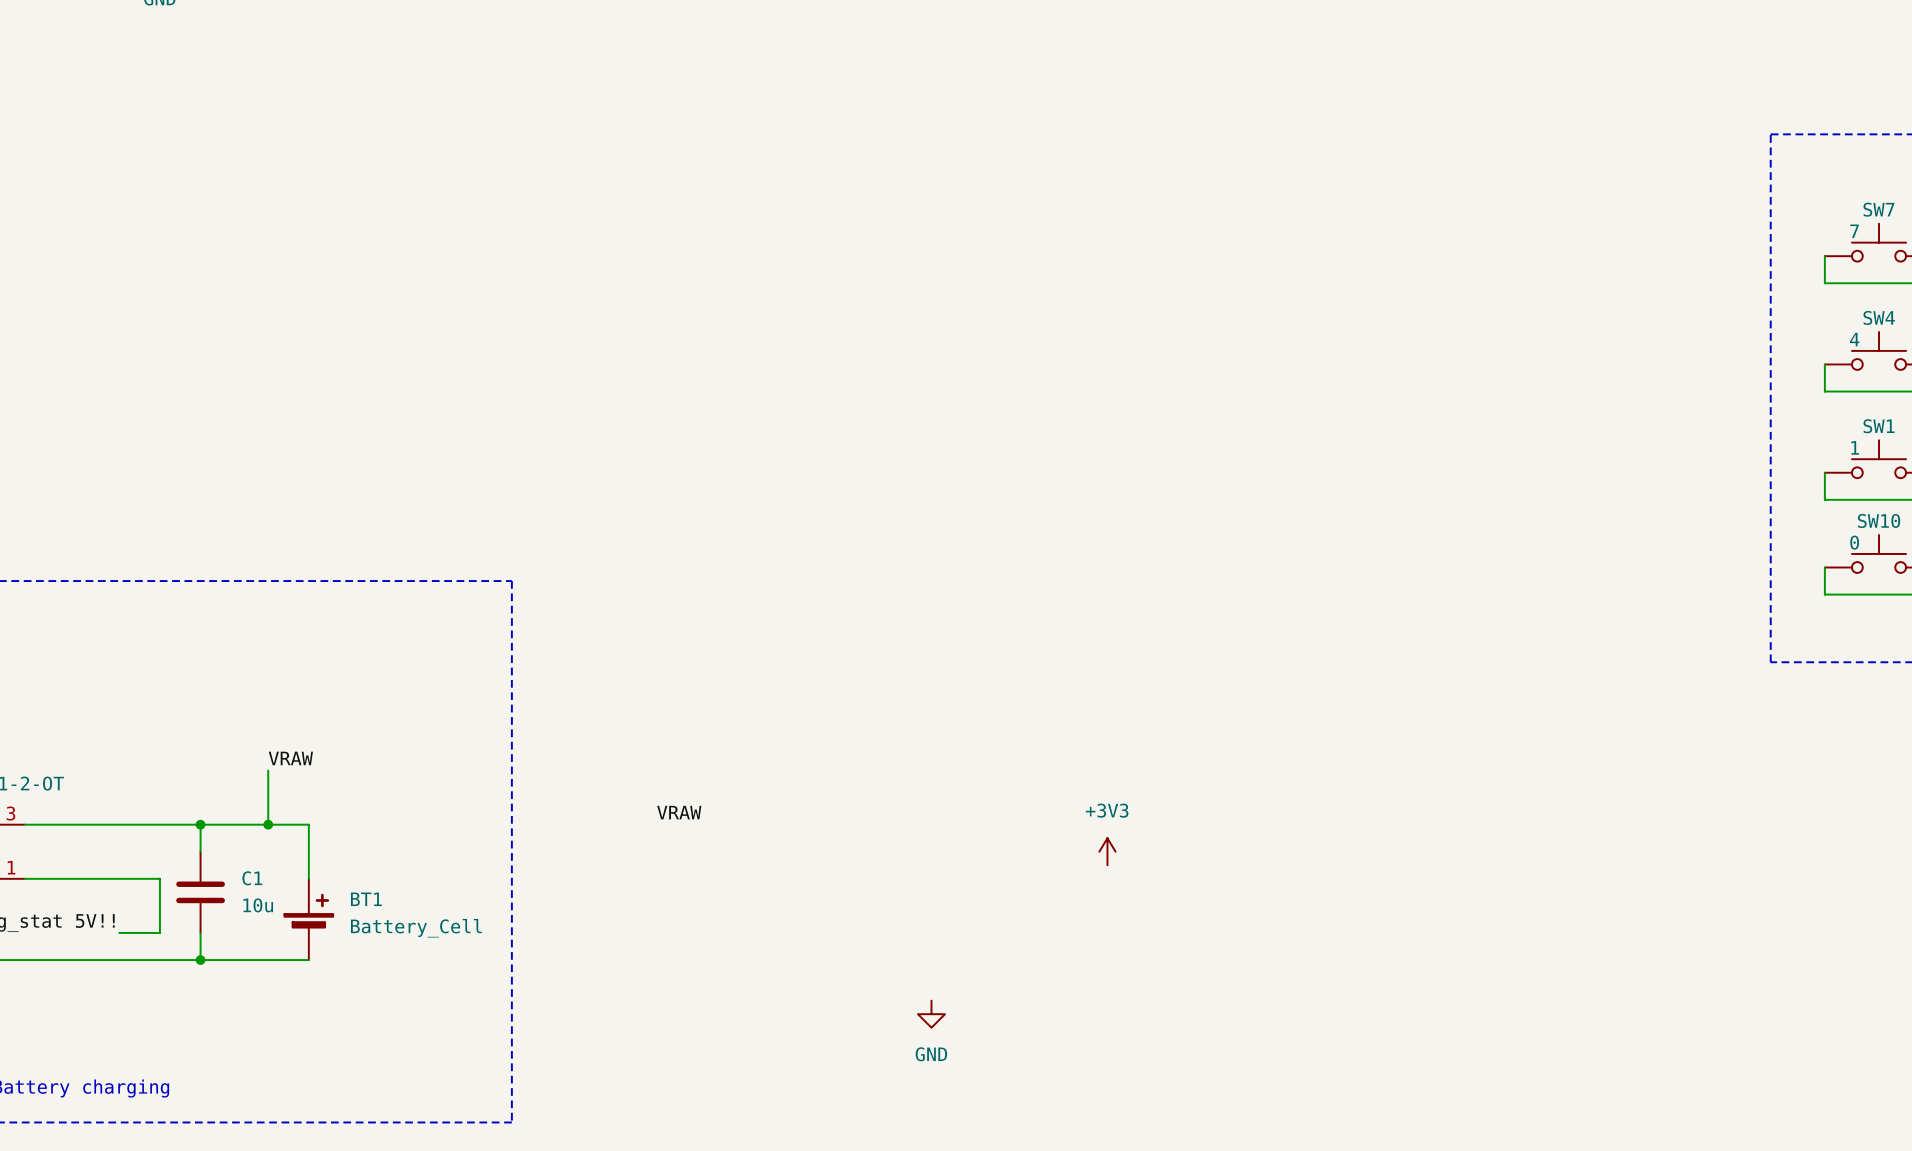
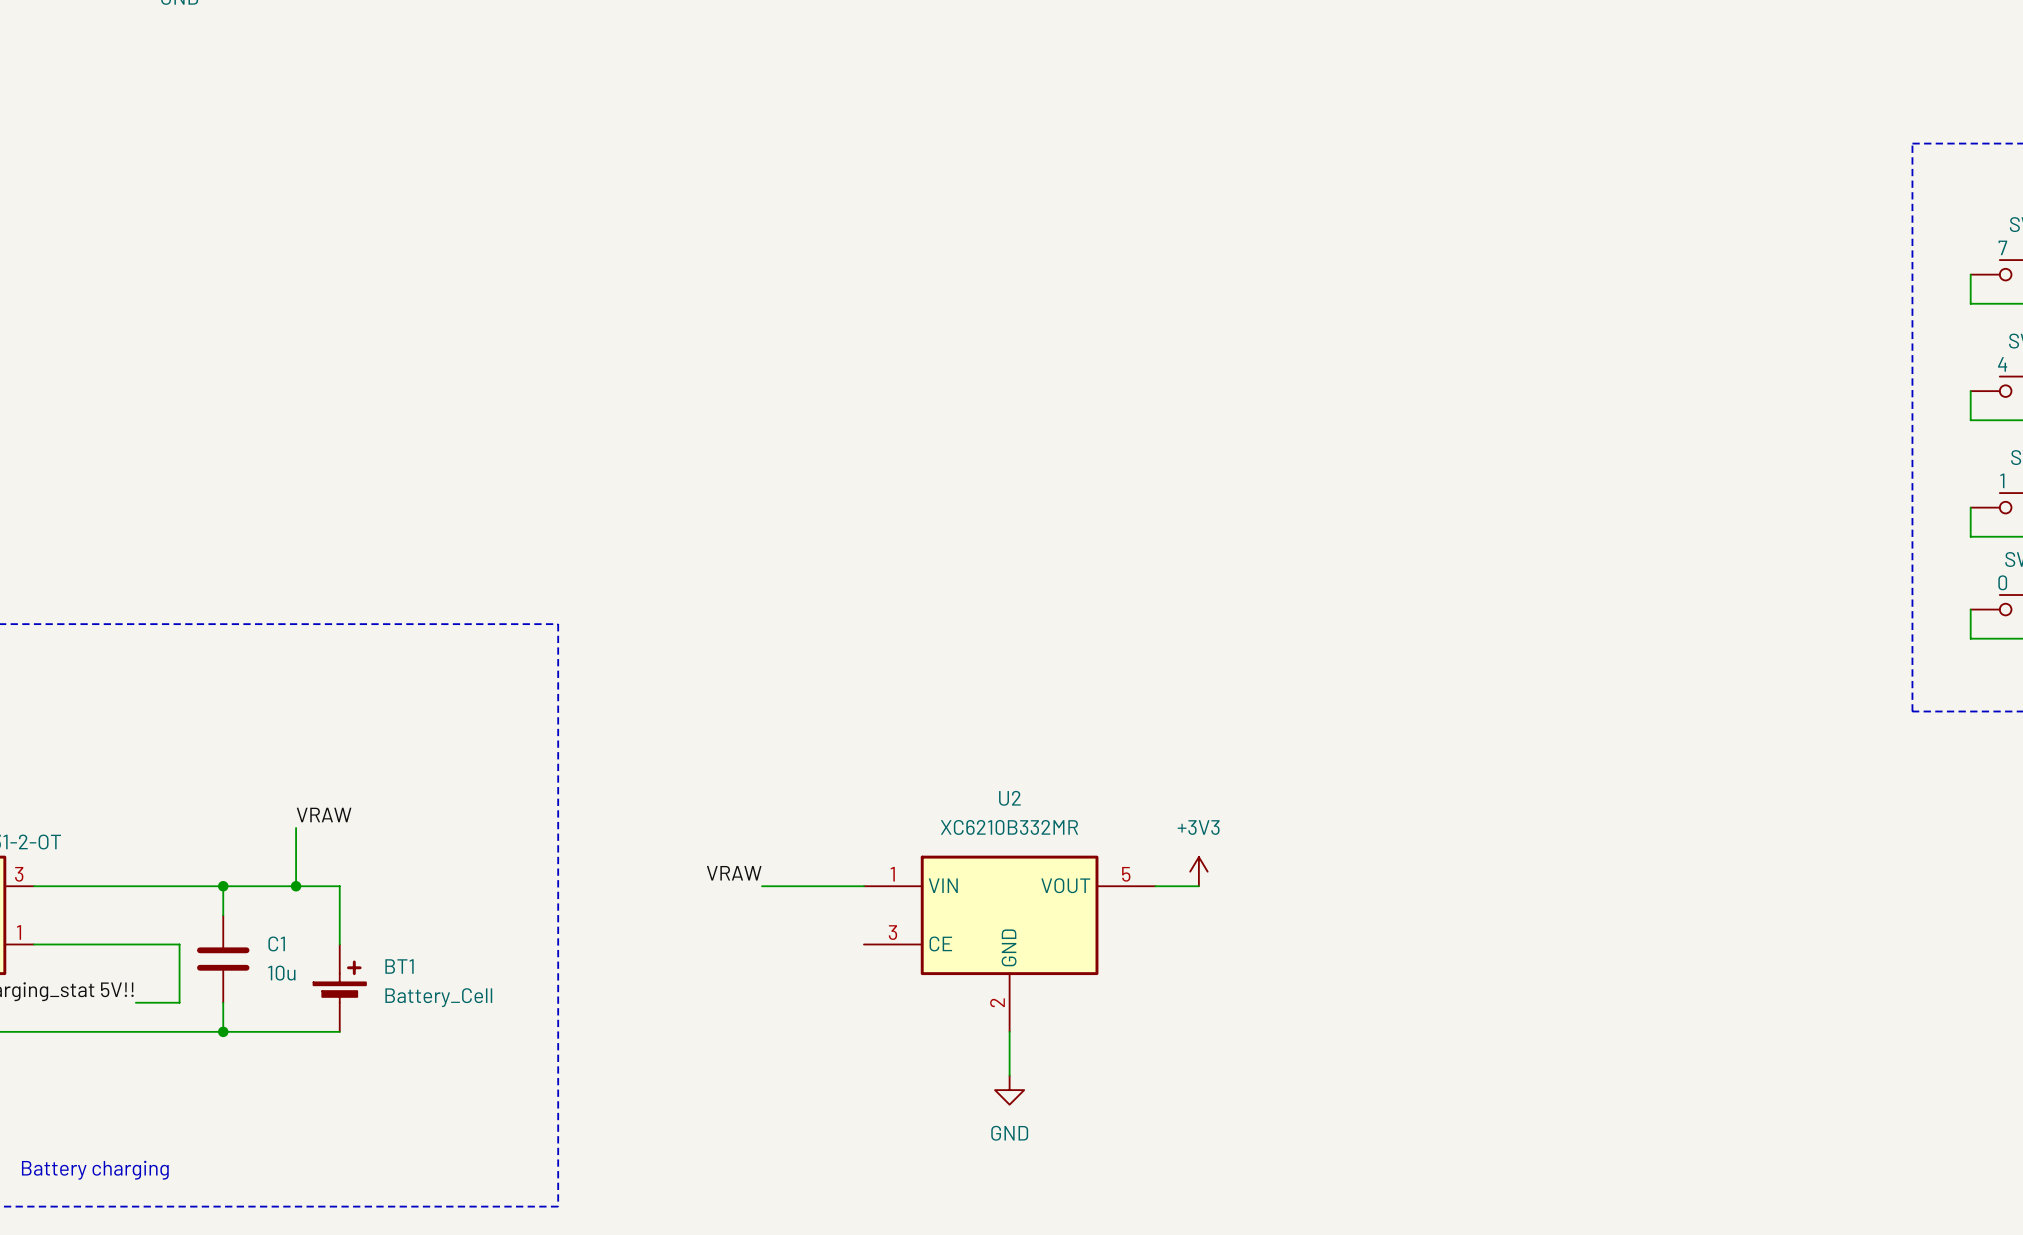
wire: none -> (762, 886) (863, 886)
wire: none -> (1155, 886) (1198, 886)
power symbol position: +3V3 (1107, 851) -> +3V3 (1198, 871)
U2: none -> XC6210B332MR (1009, 943)
wire: none -> (1009, 1031) (1009, 1075)

